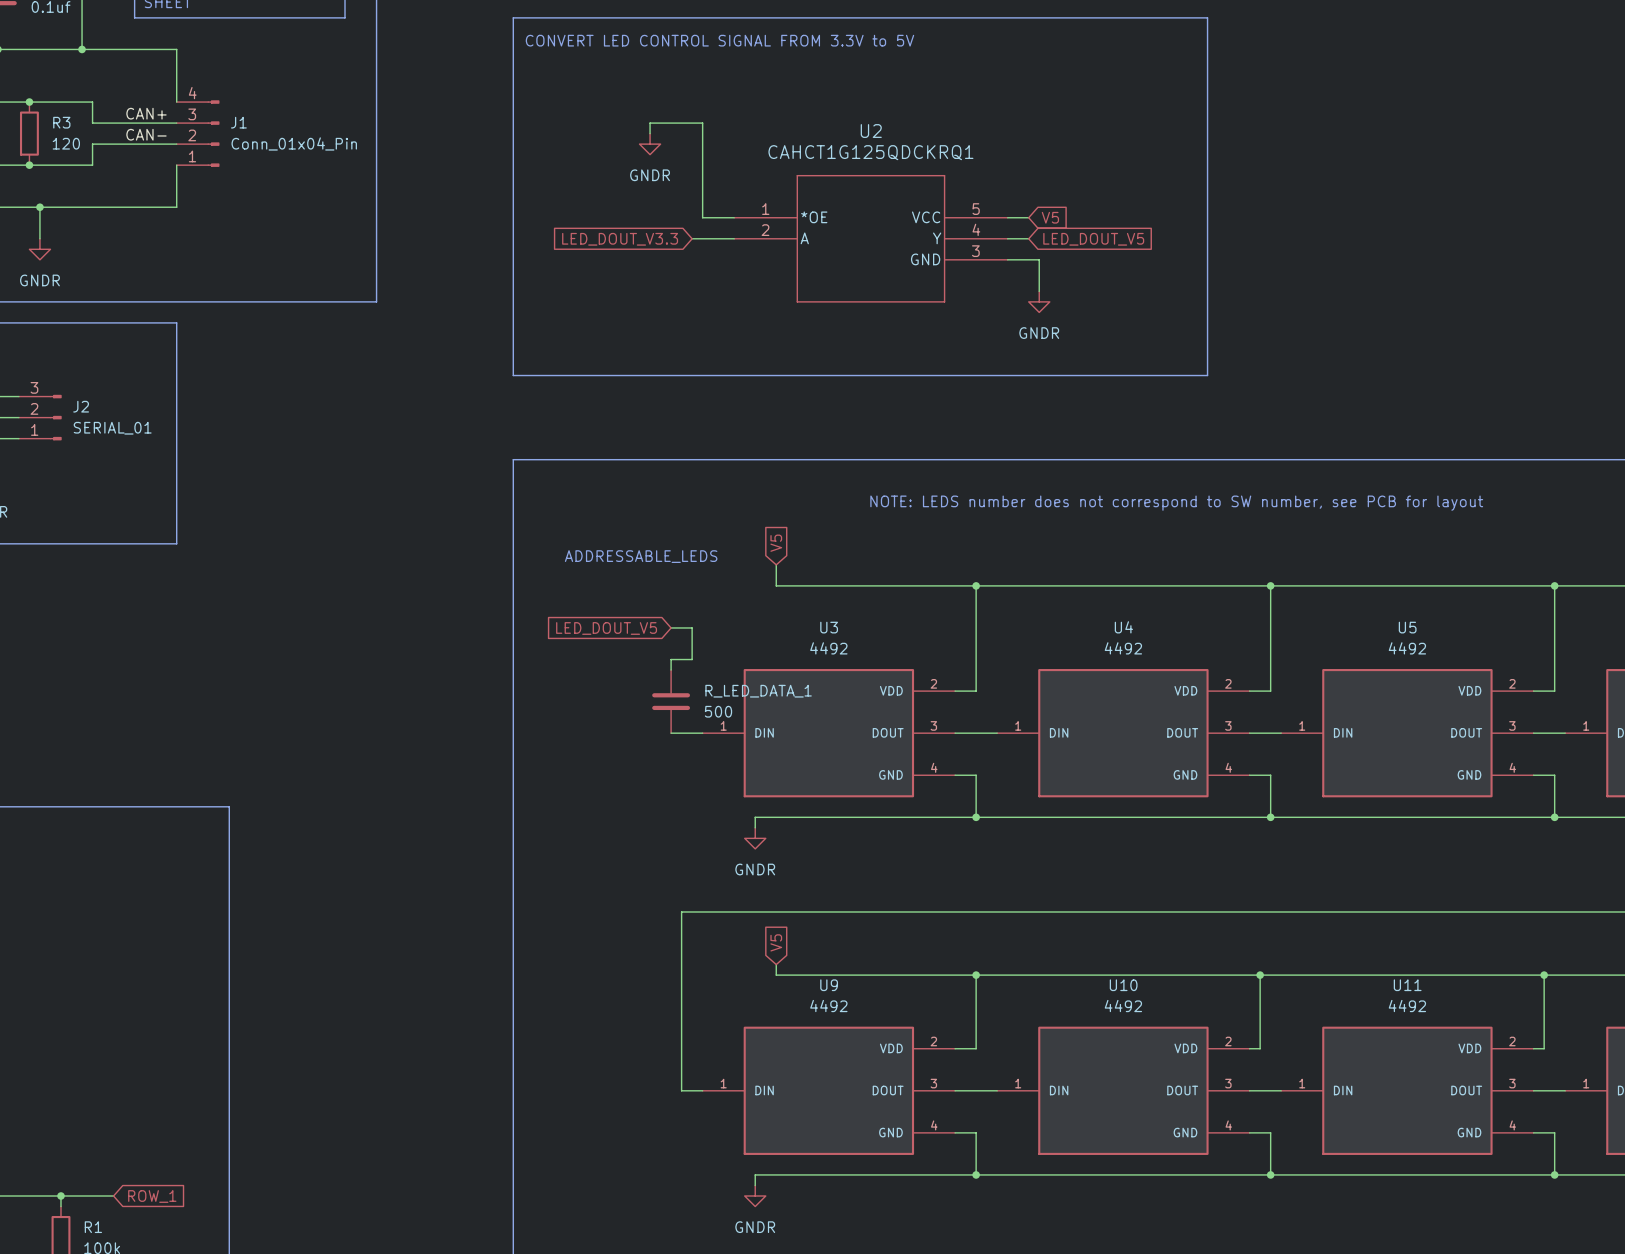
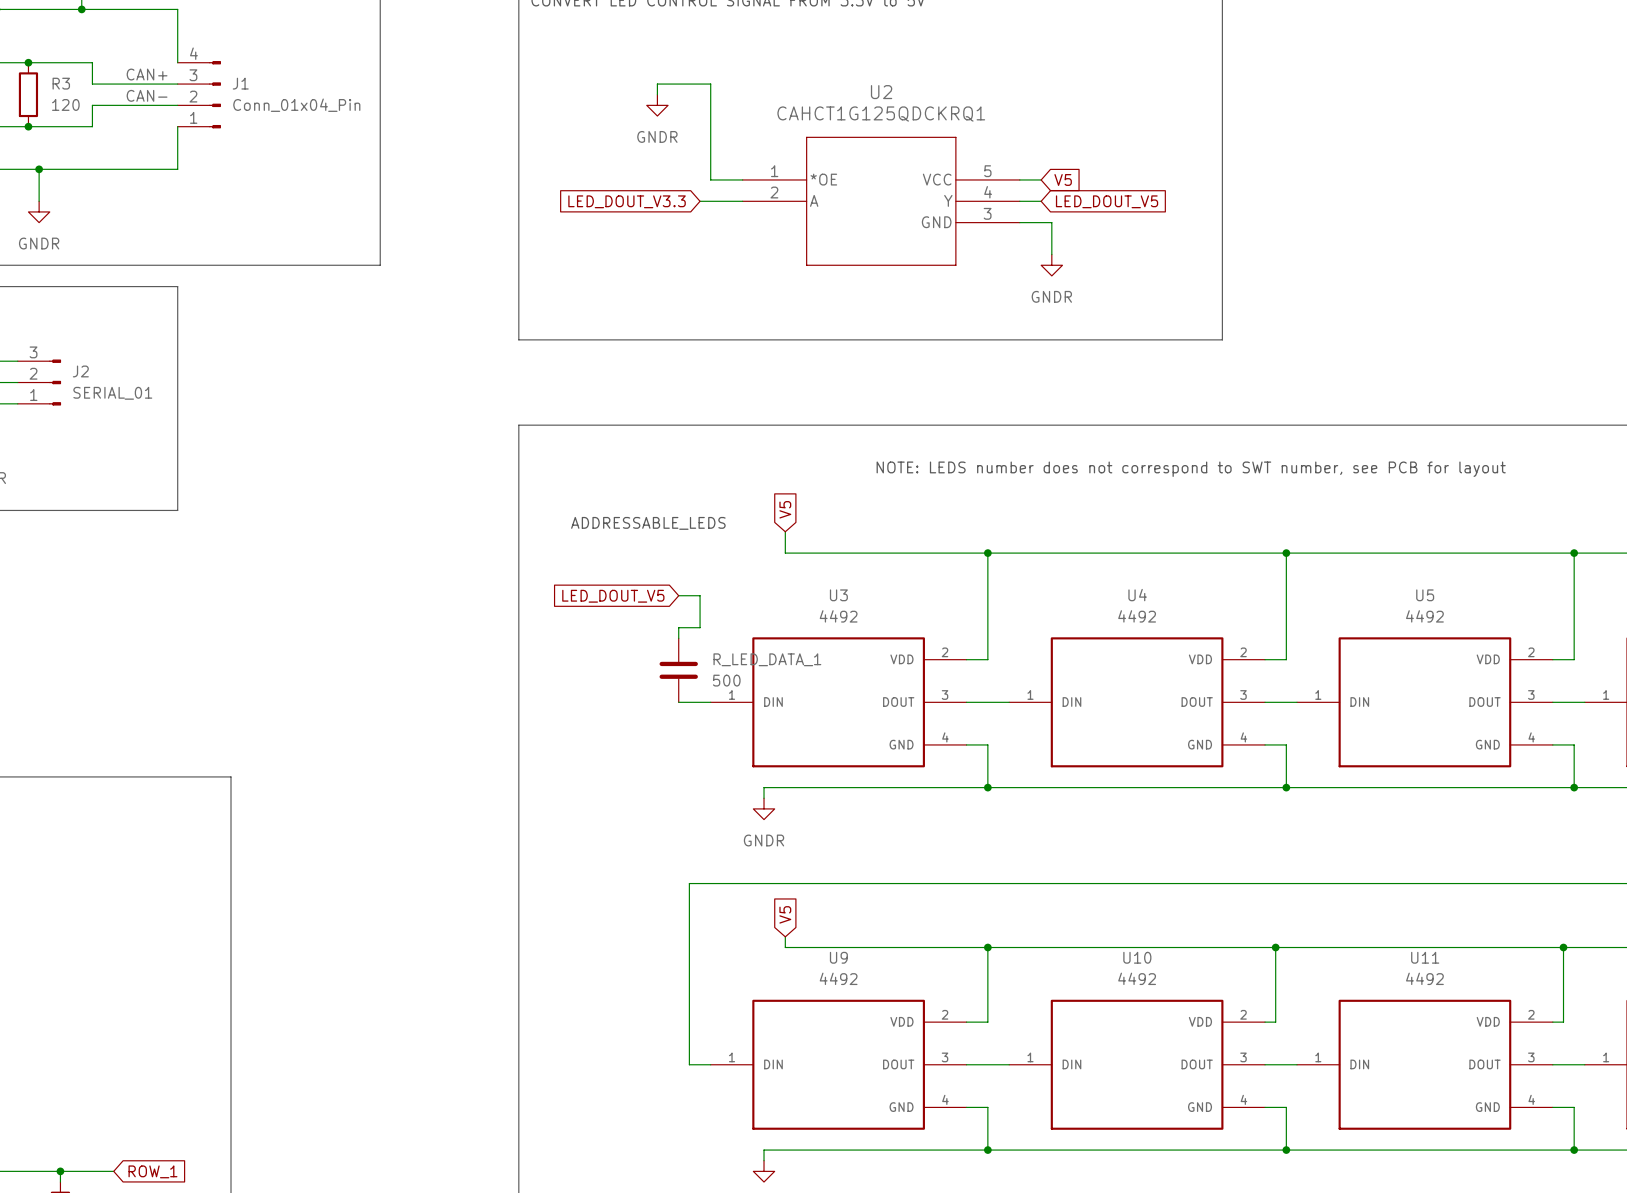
text: NOTE: LEDS number does not correspond to SW number, see PCB for layout (1176, 503) -> NOTE: LEDS number does not correspond to SWT number, see PCB for layout (1191, 469)

